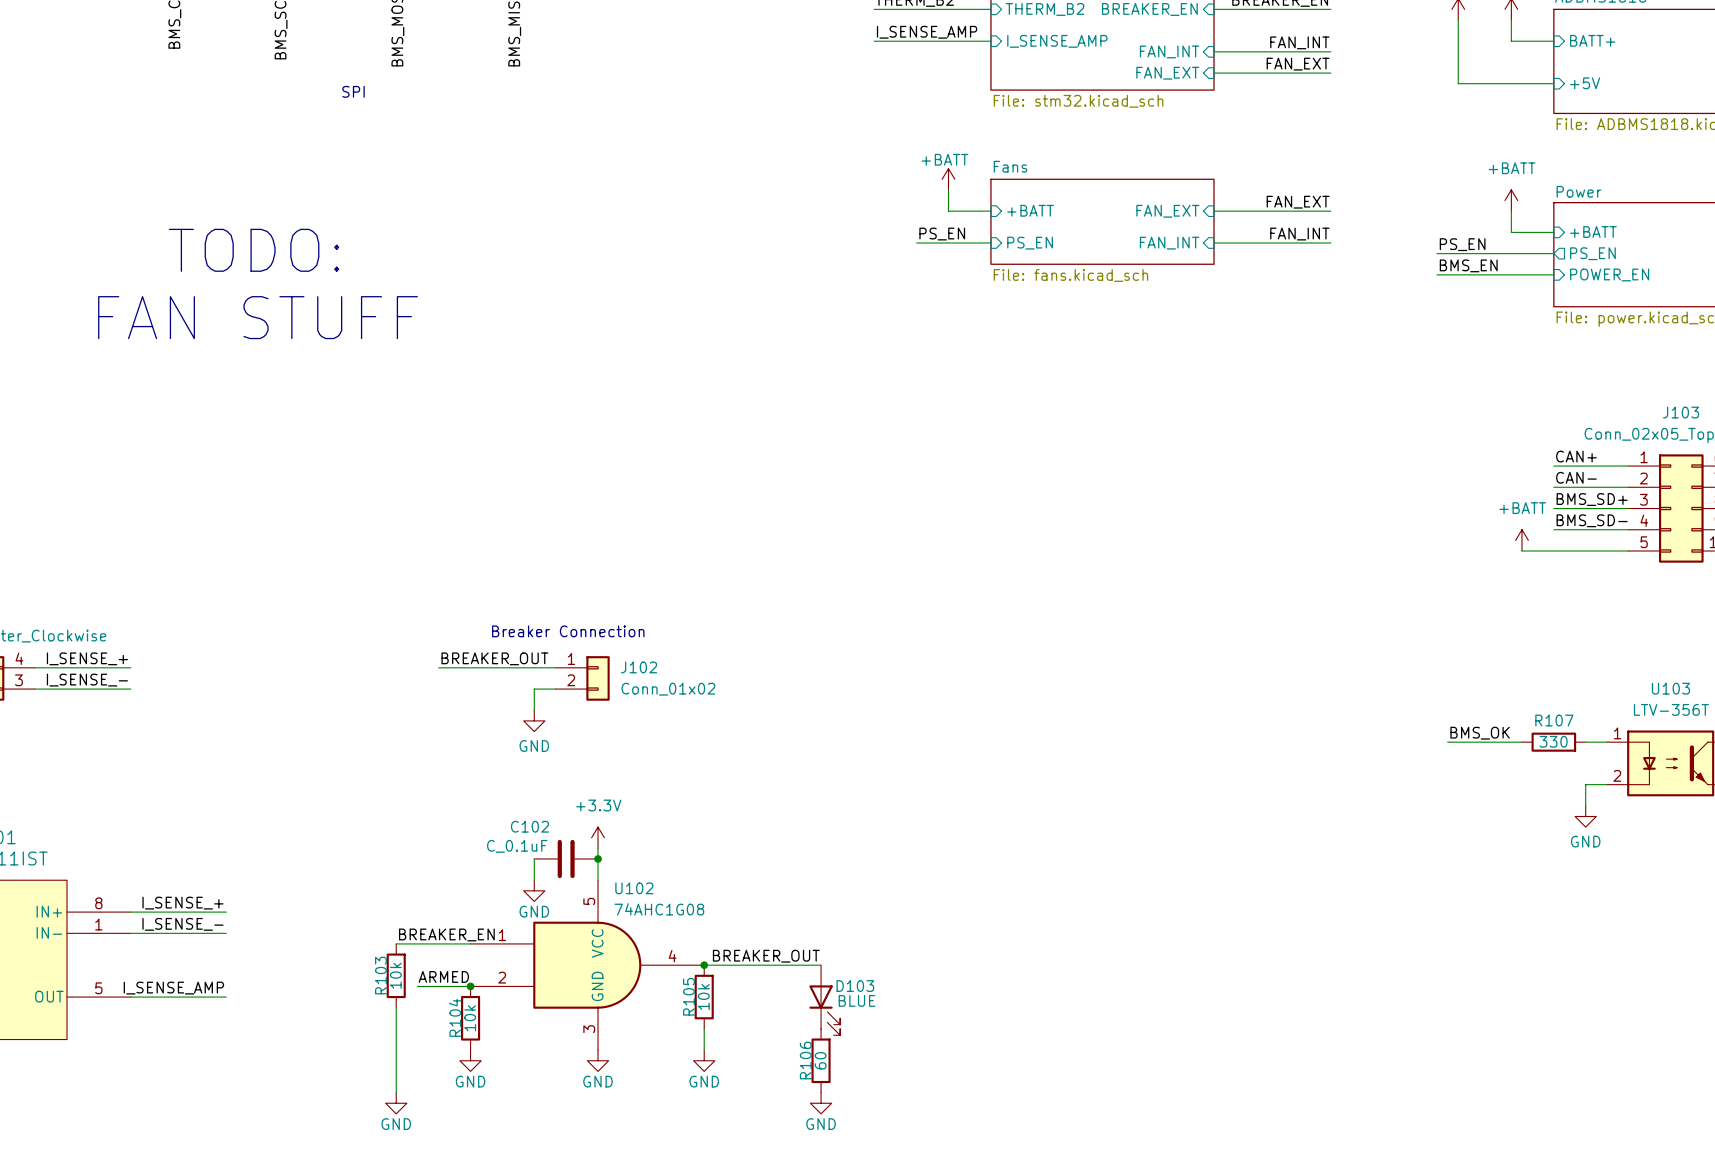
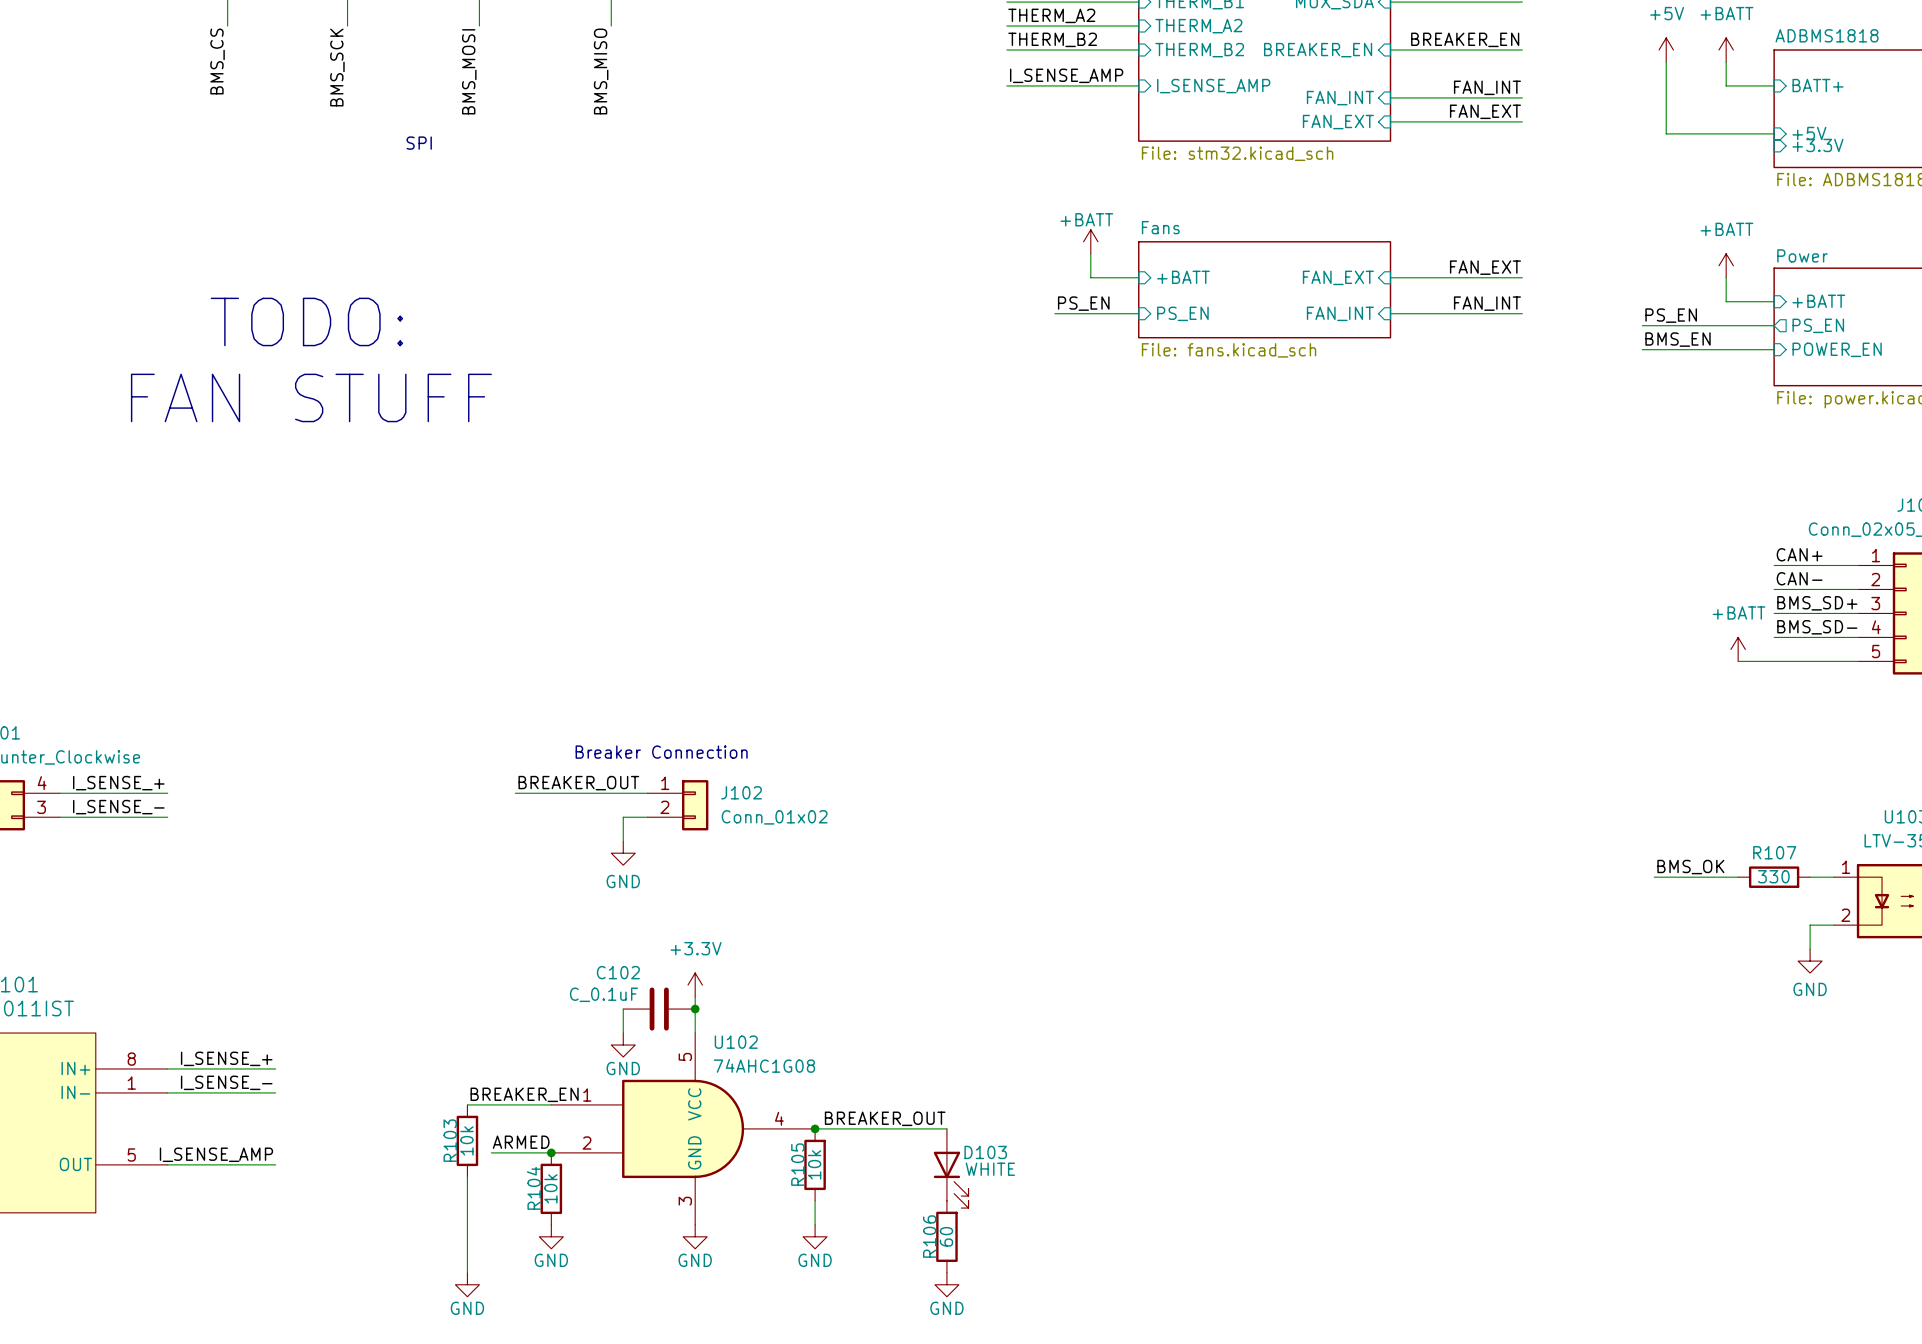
sheet pin: none -> +3.3V (1817, 145)
D103 value: BLUE (856, 1000) -> WHITE (990, 1169)

